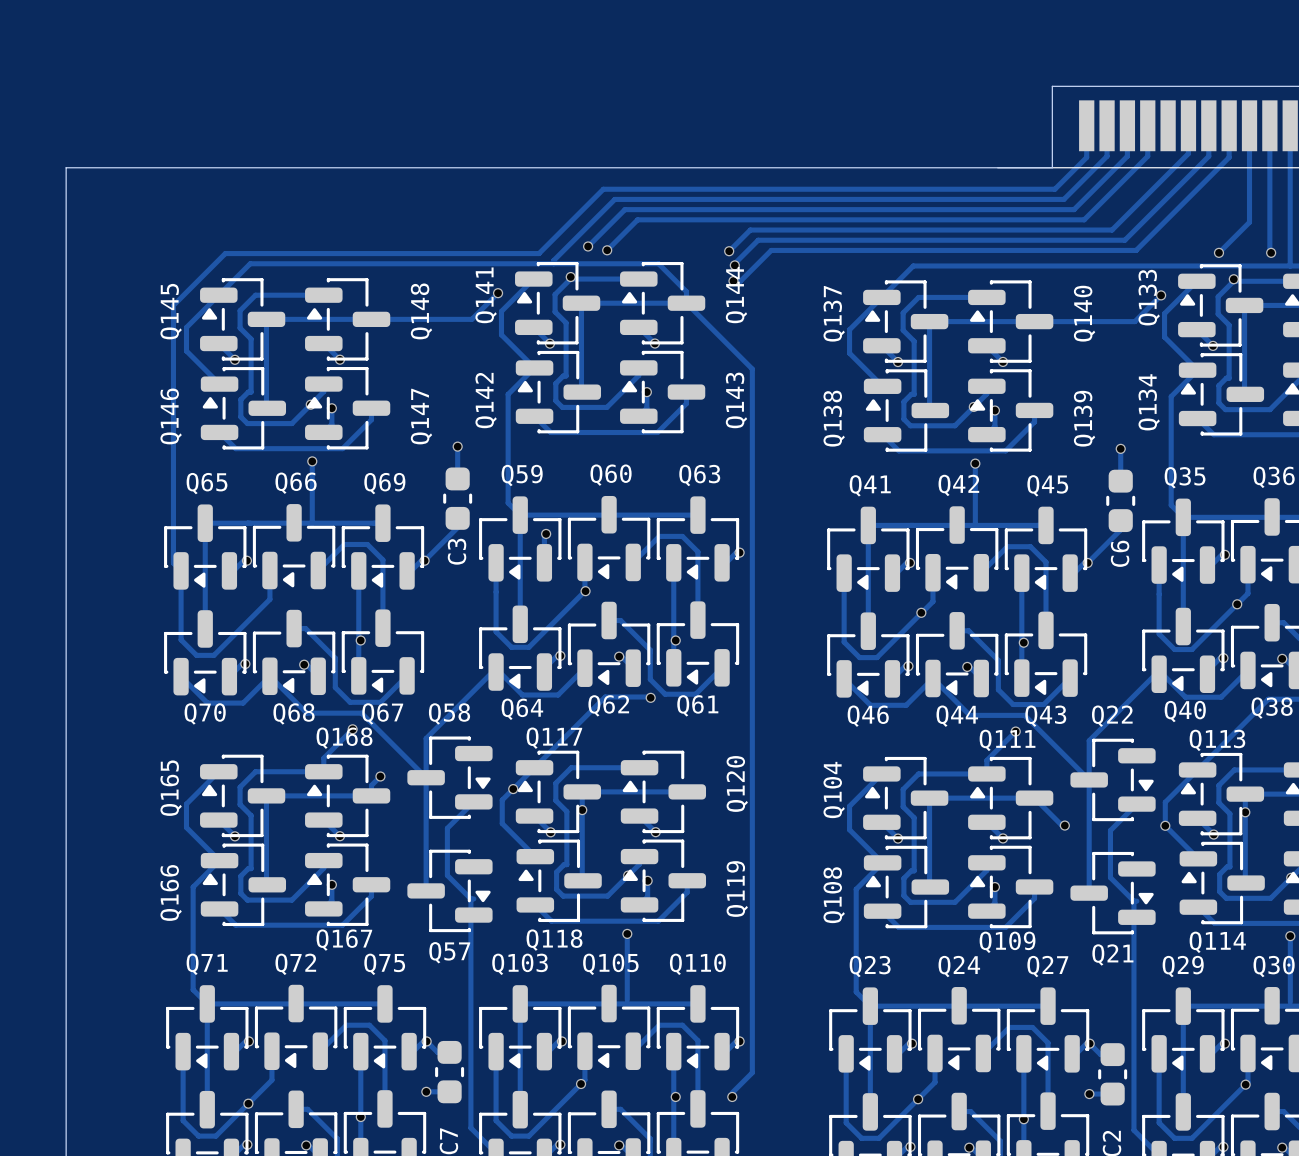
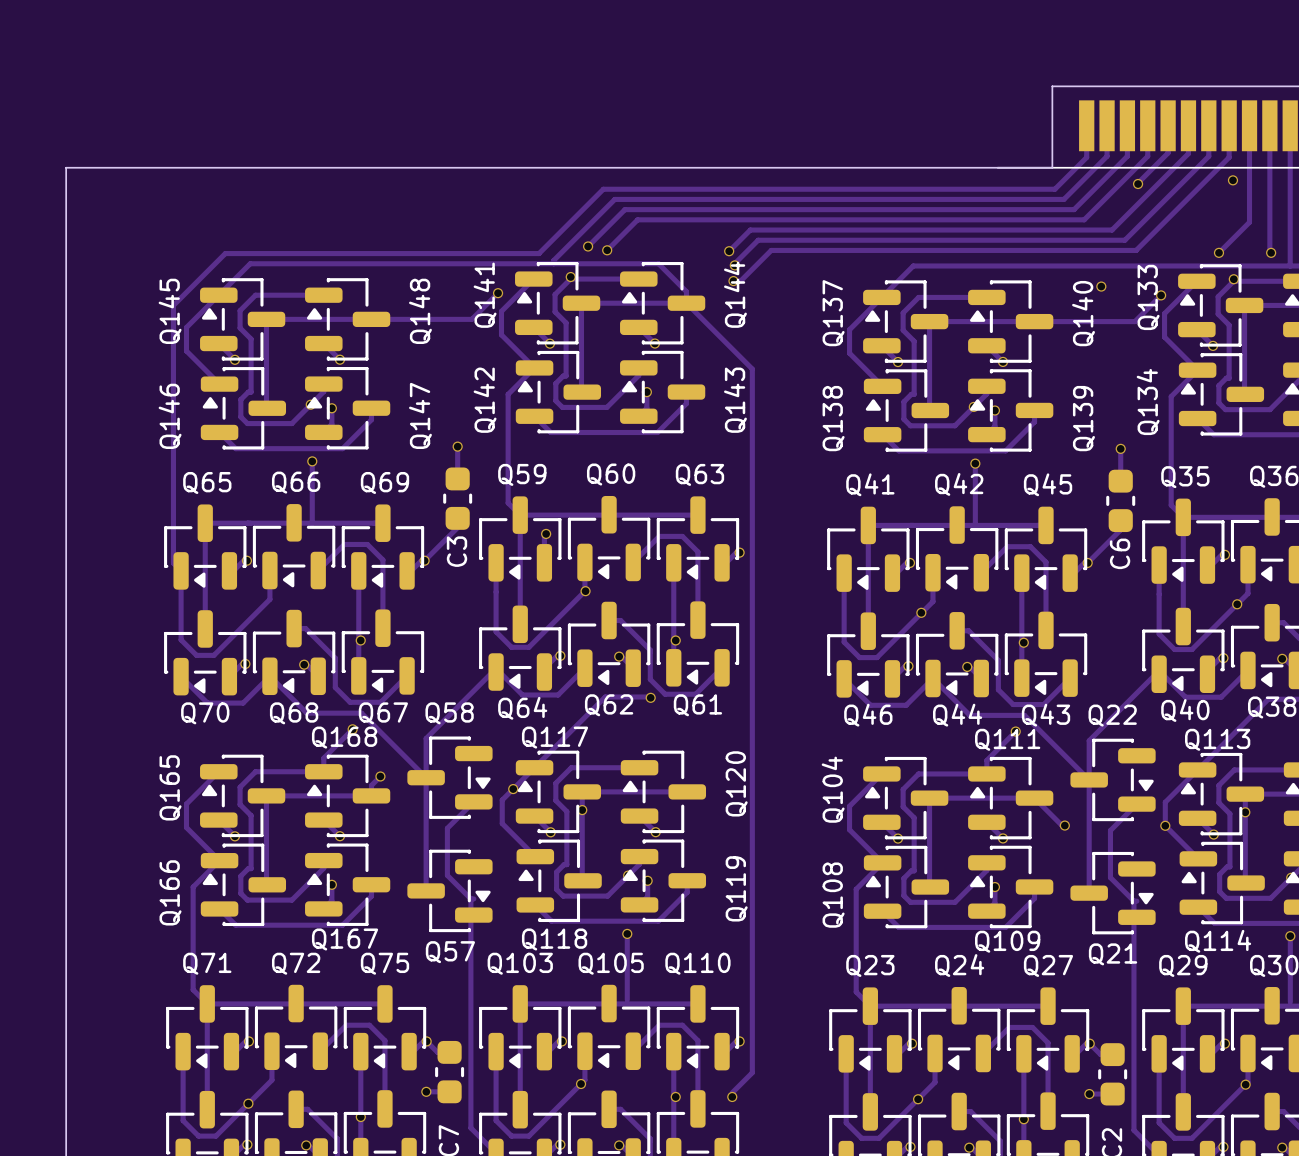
track: none -> (1168, 125) (1168, 153) (1138, 184)
via: none -> (1232, 180)
via: none -> (1138, 184)
via: none -> (1101, 286)

